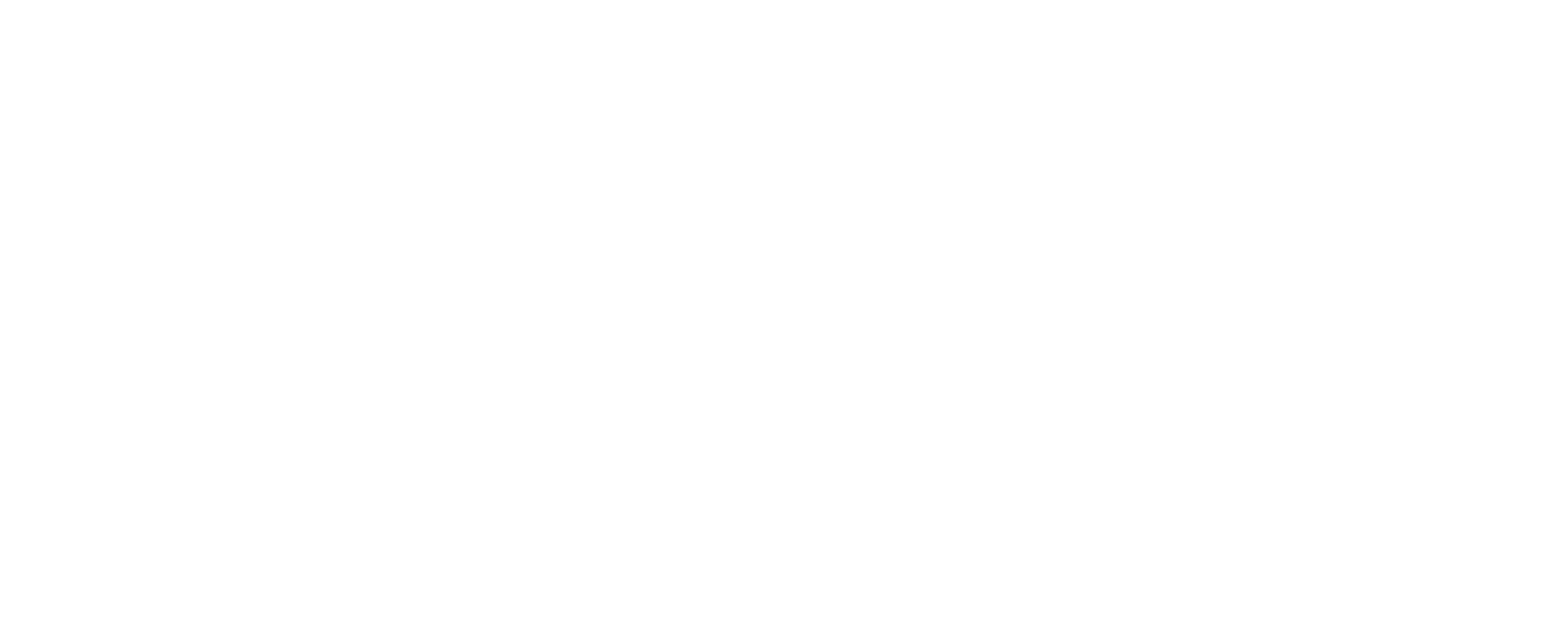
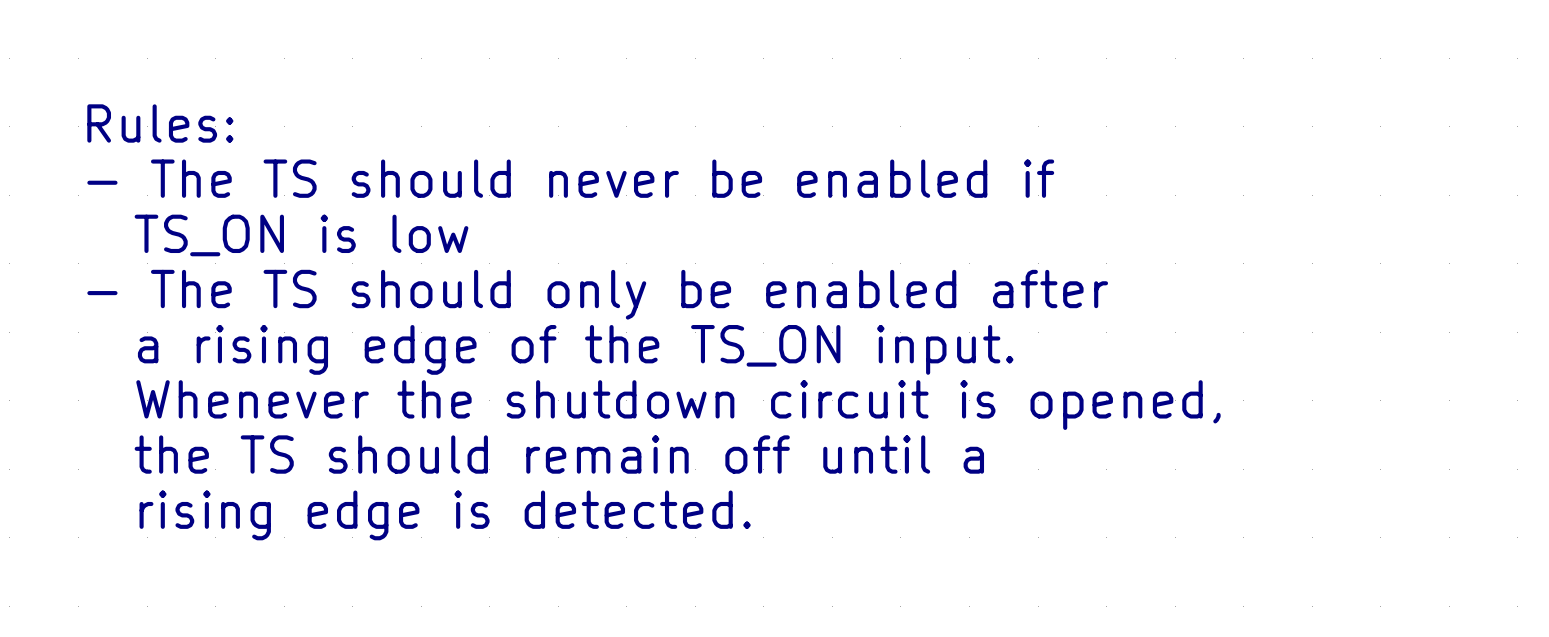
text: none -> Rules: (160, 123)
text: none -> - The TS should never be enabled if (570, 178)
text: none -> TS_ON is low (301, 235)
text: none -> - The TS should only be enabled after (597, 294)
text: none -> a rising edge of the TS_ON input. (575, 349)
text: none -> Whenever the shutdown circuit is opened, (678, 405)
text: none -> the TS should remain off until a (559, 454)
text: none -> rising edge is detected. (445, 515)

